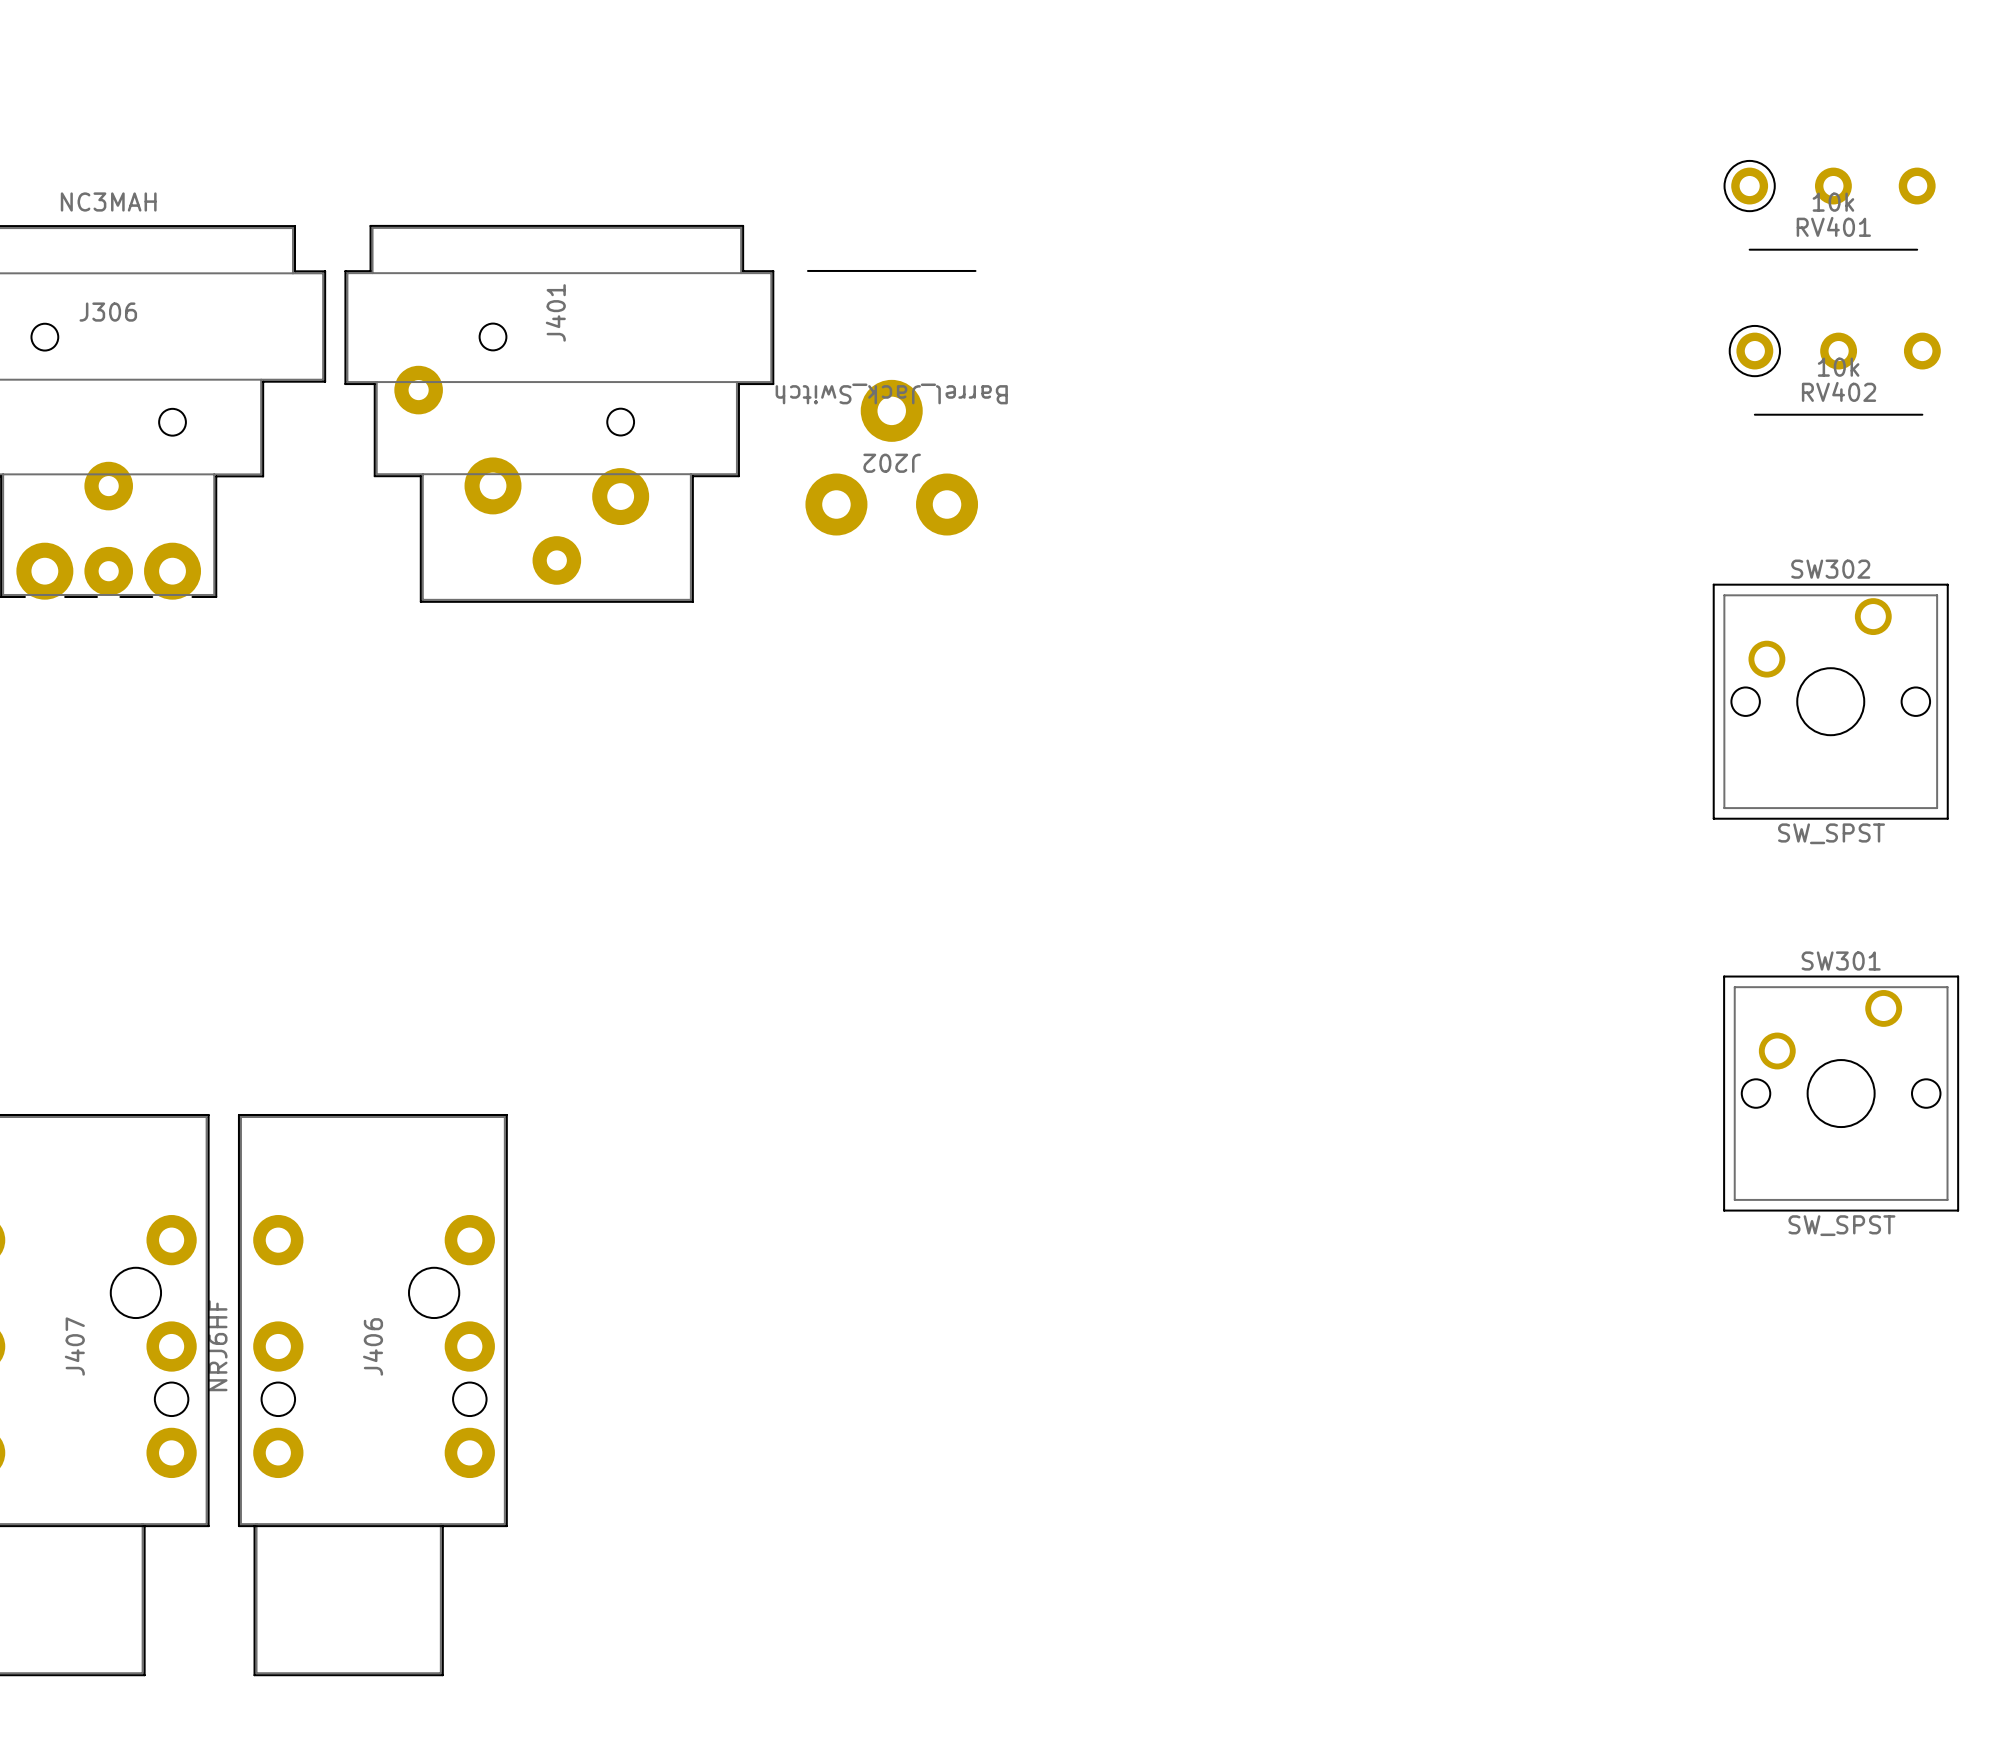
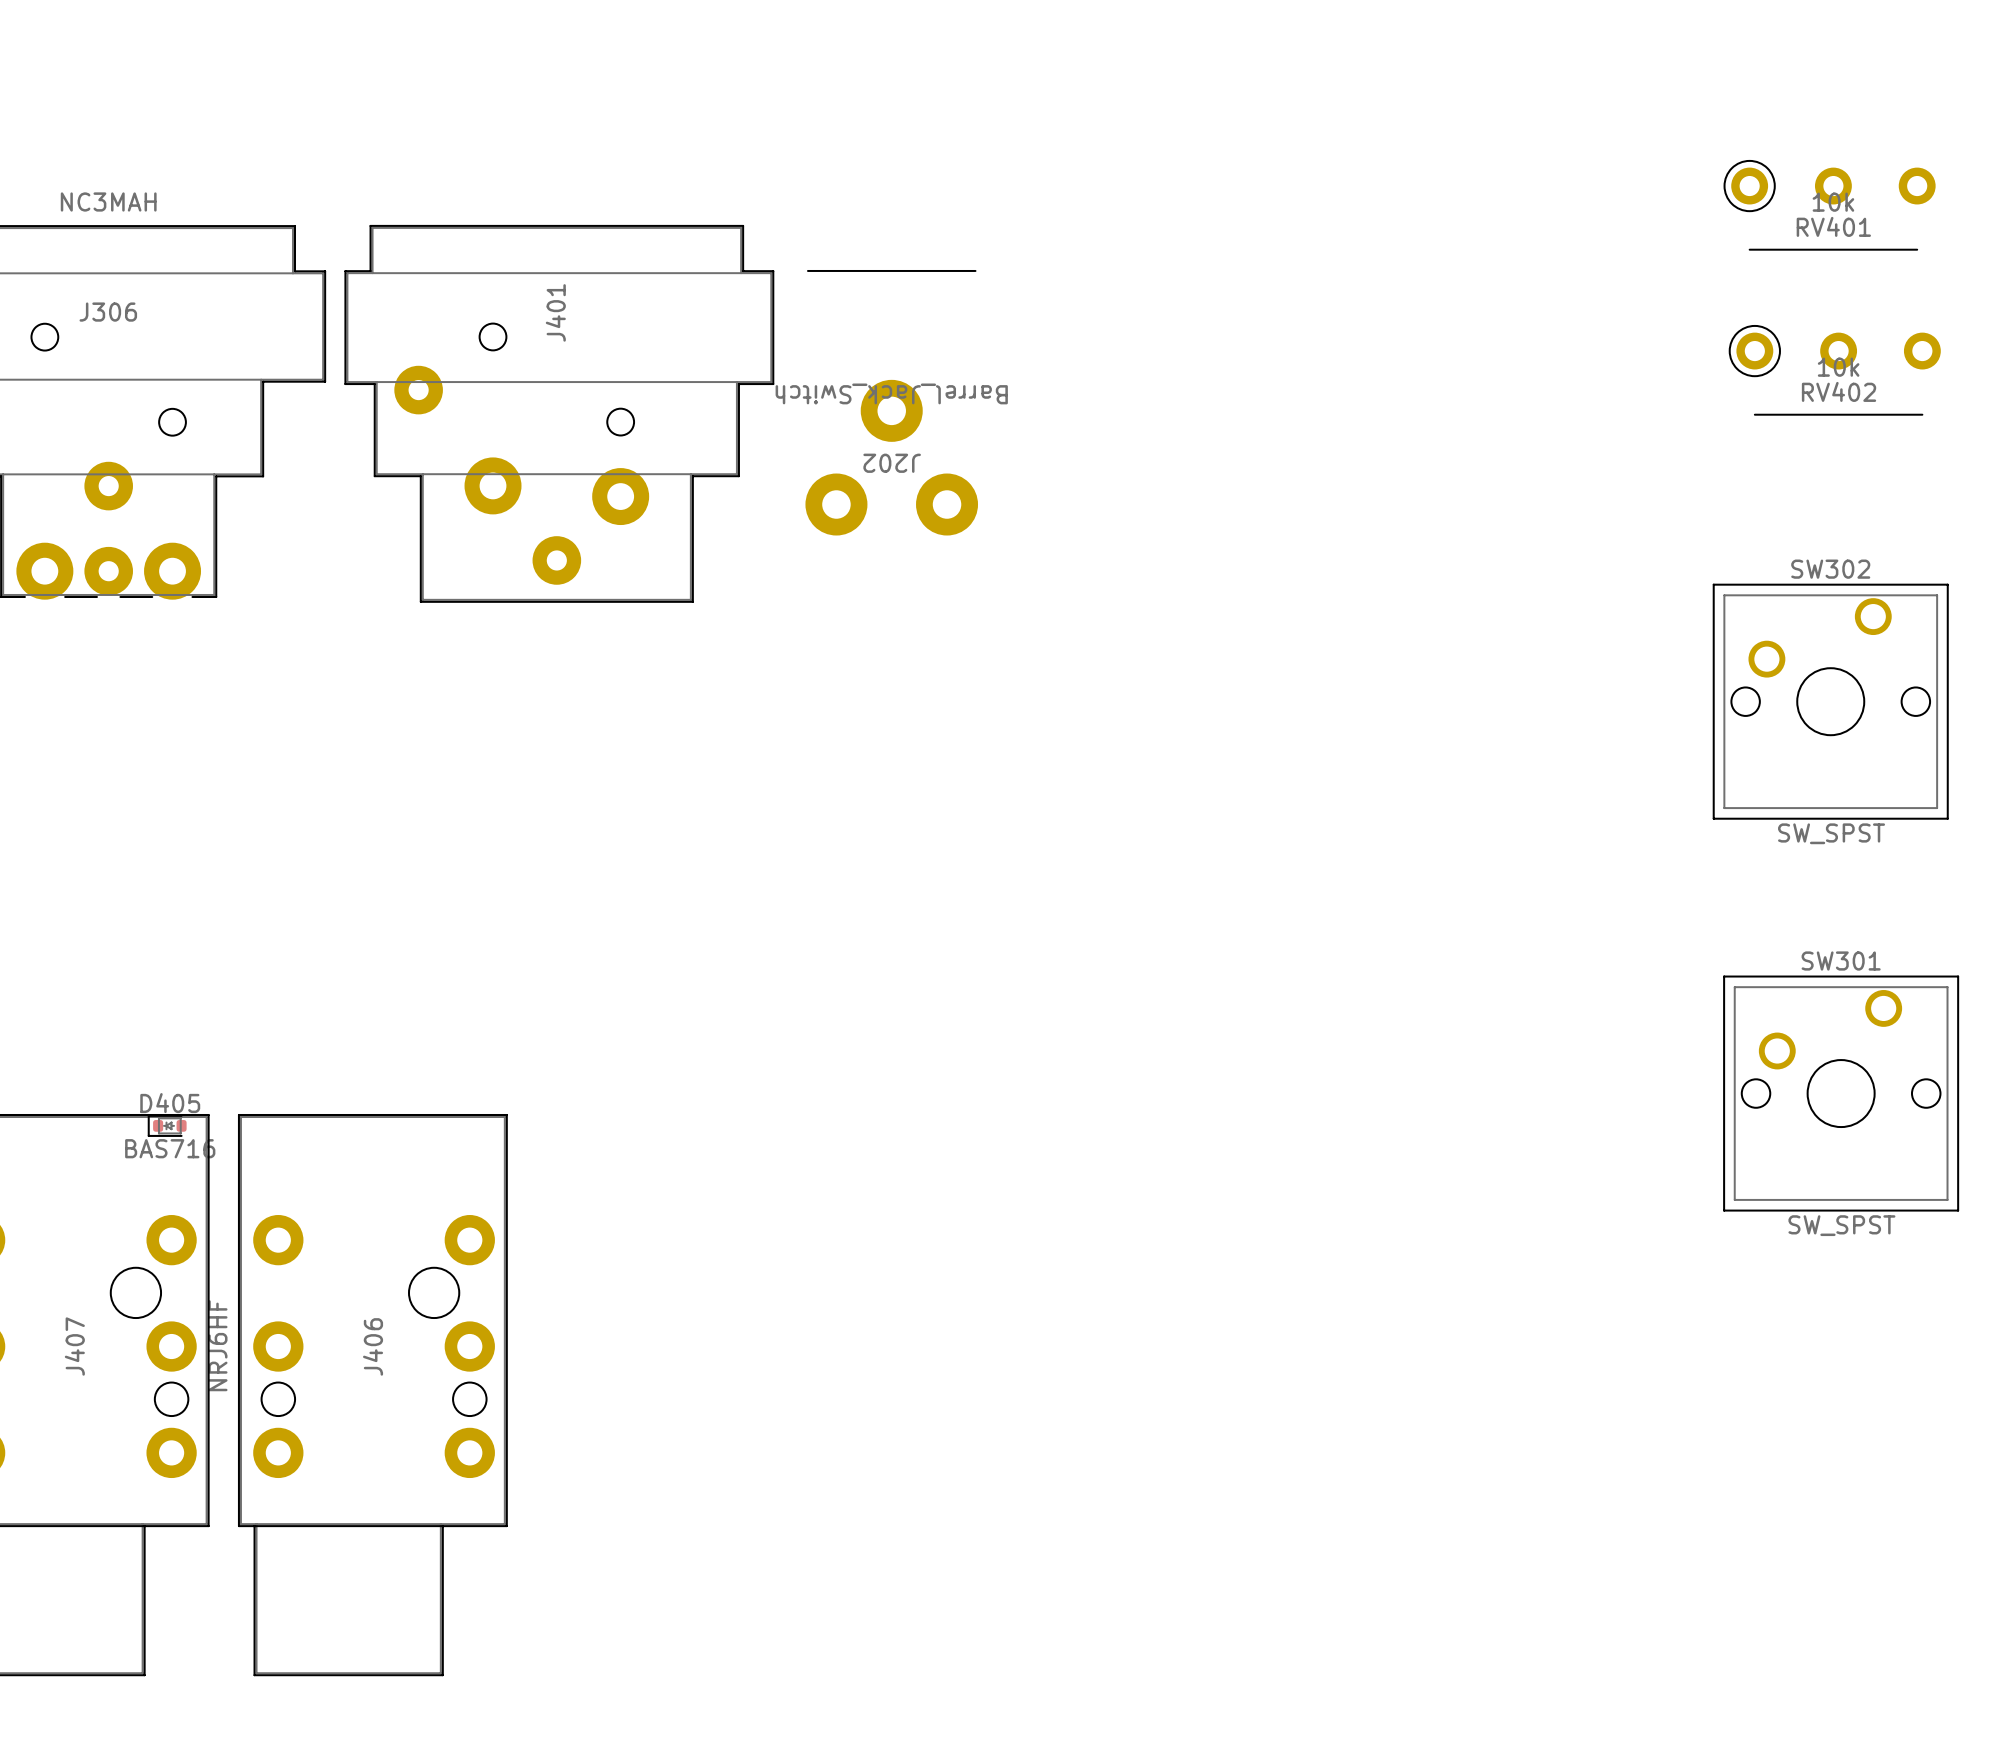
D405: none -> BAS716 (167, 1125)

